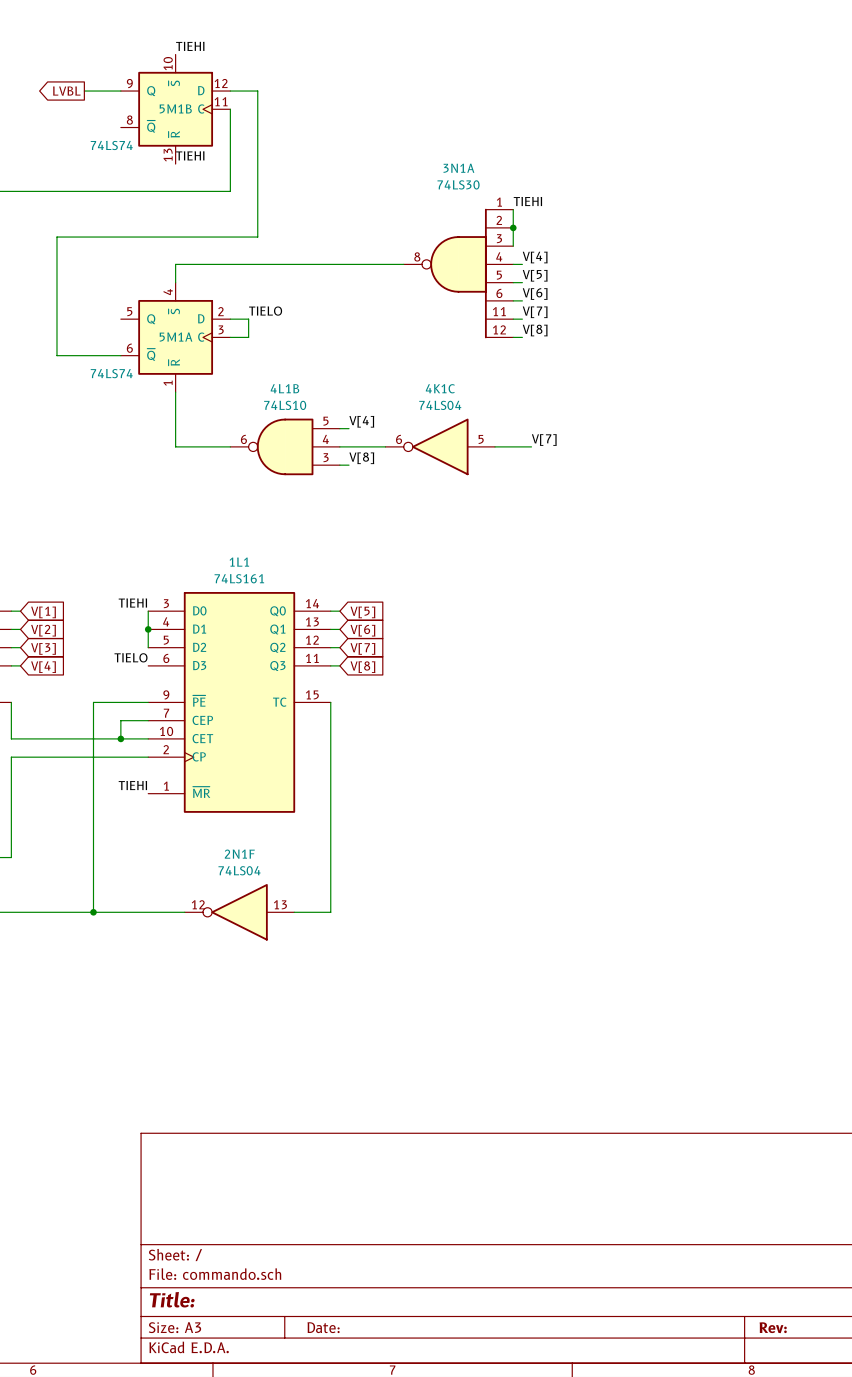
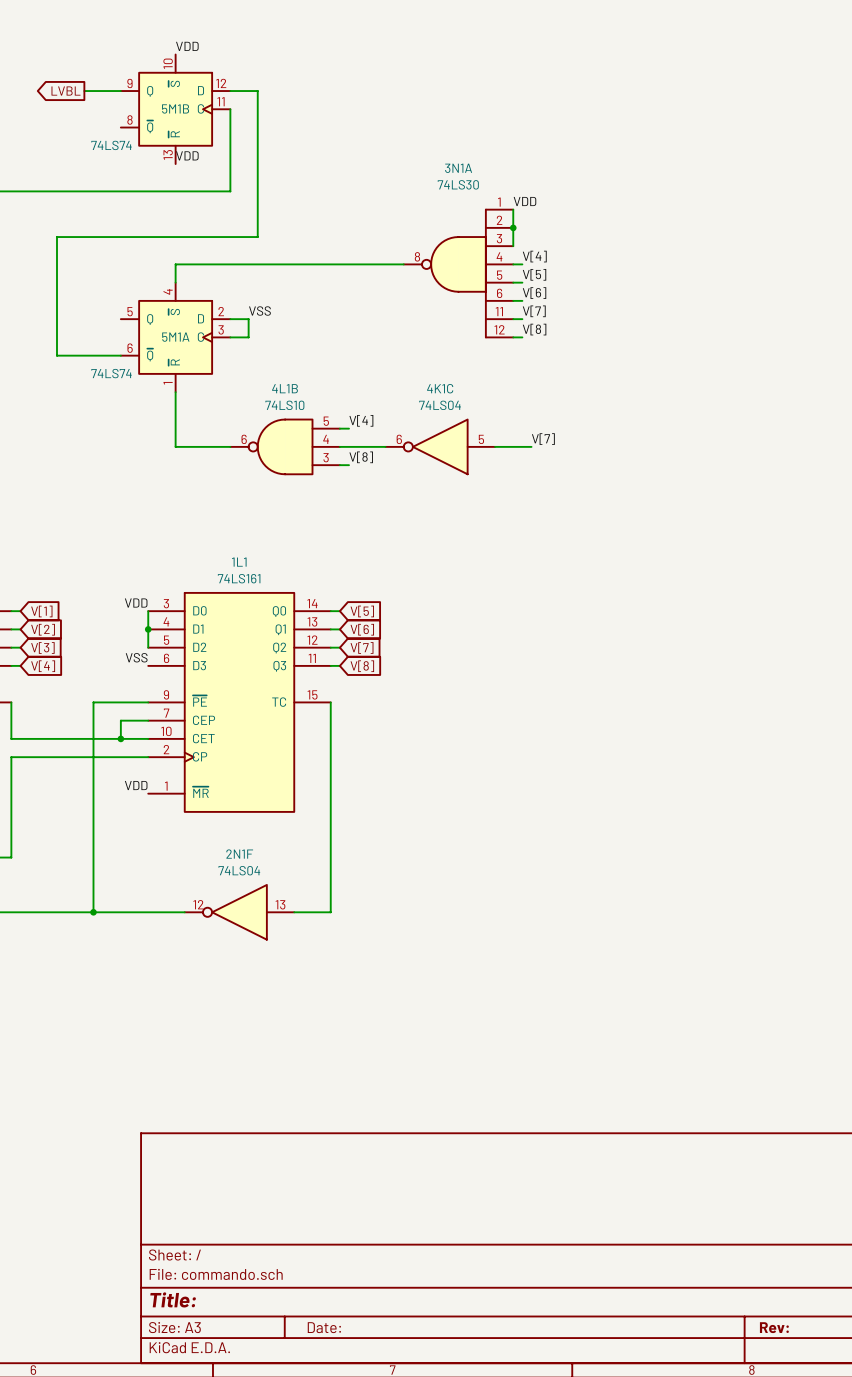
label: TIEHI (190, 46) -> VDD (187, 46)
label: TIEHI (190, 155) -> VDD (187, 155)
label: TIEHI (527, 201) -> VDD (524, 201)
label: TIELO (265, 311) -> VSS (259, 311)
label: TIEHI (132, 603) -> VDD (136, 603)
label: TIELO (131, 657) -> VSS (136, 657)
label: TIEHI (132, 785) -> VDD (136, 785)

